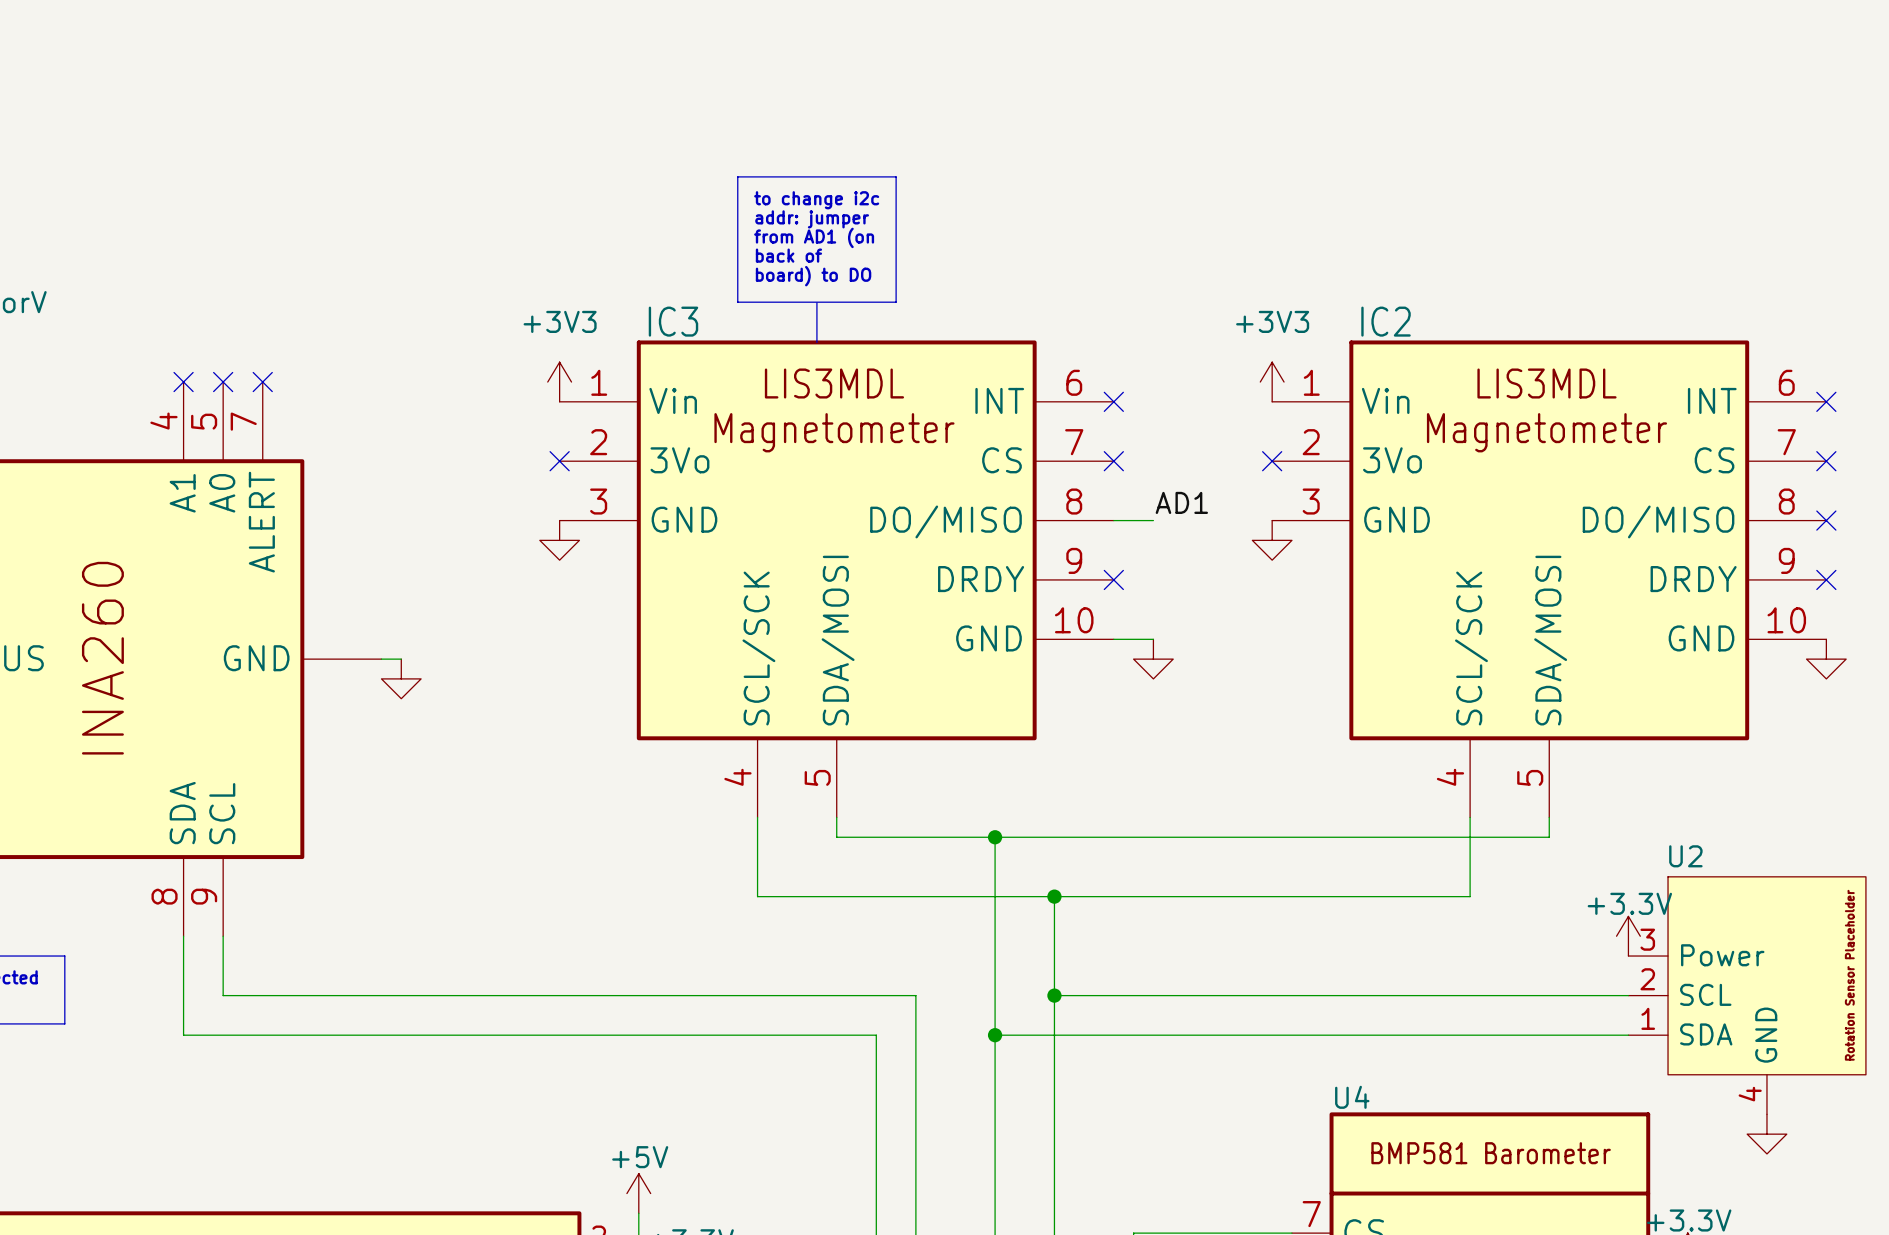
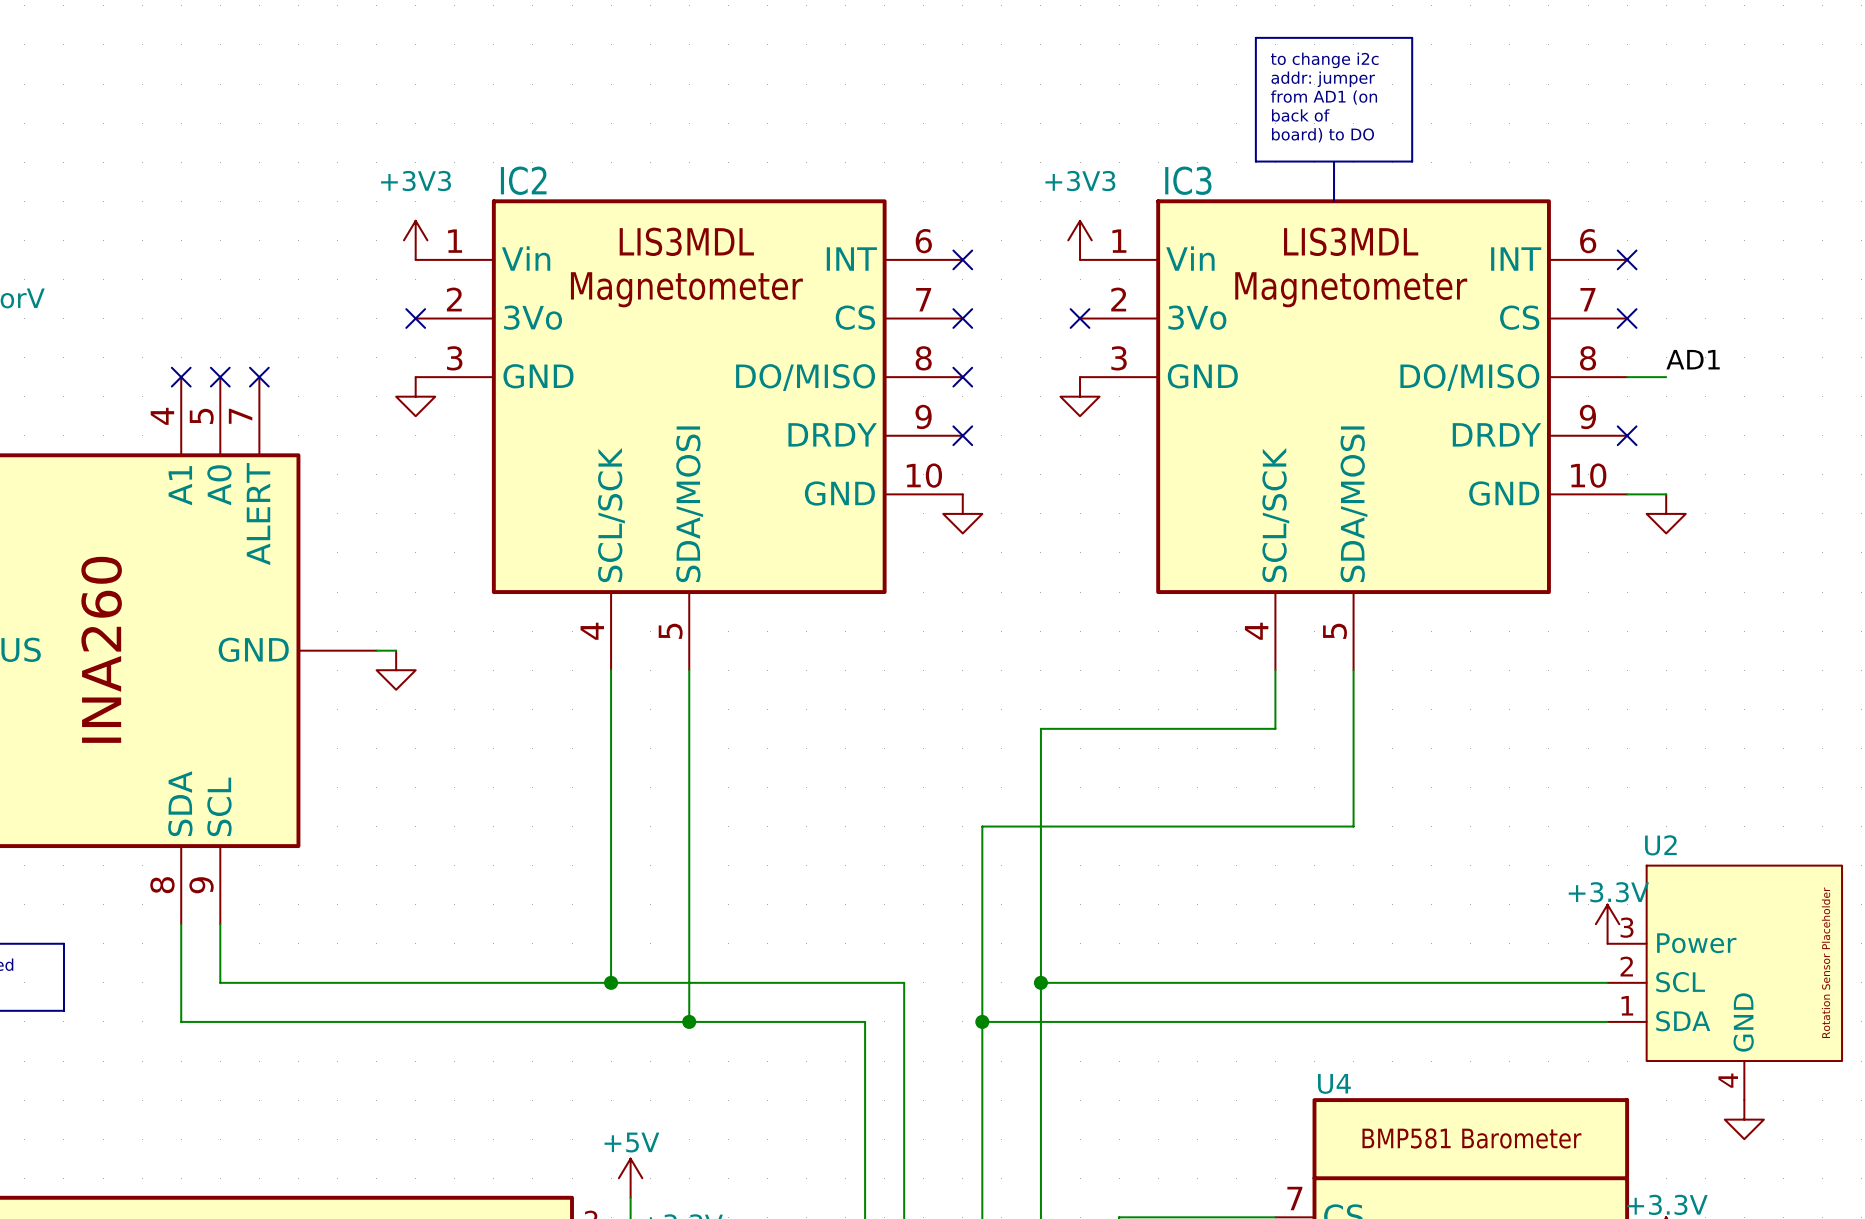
line: none -> (1255, 37) (1412, 37) (1412, 161) (1255, 161) (1255, 37)
text: none -> to change i2c (1324, 60)
text: none -> addr: jumper (1323, 79)
text: none -> from AD1 (on (1323, 97)
text: none -> back of (1300, 115)
text: none -> board) to DO (1323, 135)
bus: none -> (1334, 162) (1334, 201)
line: (737, 176) (896, 176) (896, 302) (737, 302) (737, 176) -> none
text: to change i2c (816, 200) -> none
text: addr: jumper (812, 219) -> none
text: from AD1 (on (814, 237) -> none
text: back of (788, 255) -> none
no-connect mark: none -> (962, 259)
no-connect mark: none -> (1627, 259)
text: board) to DO (813, 276) -> none
bus: (816, 302) (816, 342) -> none
no-connect mark: none -> (415, 318)
no-connect mark: none -> (962, 318)
no-connect mark: none -> (1080, 318)
no-connect mark: none -> (1627, 318)
label: none -> AD1 (1693, 359)
power symbol position: +3V3 (559, 382) -> +3V3 (415, 240)
no-connect mark: none -> (962, 377)
power symbol position: +3V3 (1272, 382) -> +3V3 (1080, 240)
power symbol: none -> (1080, 396)
no-connect mark: (1113, 401) -> none
no-connect mark: (1826, 401) -> none
no-connect mark: none -> (962, 435)
no-connect mark: none -> (1627, 435)
no-connect mark: (559, 461) -> none
no-connect mark: (1113, 461) -> none
no-connect mark: (1272, 461) -> none
no-connect mark: (1826, 461) -> none
label: AD1 (1181, 502) -> none
power symbol: none -> (962, 513)
wire: (1113, 520) (1153, 520) -> none
no-connect mark: (1826, 520) -> none
power symbol position: (559, 540) -> (415, 396)
power symbol: (1272, 540) -> none
IC3 position: (836, 578) -> (1353, 434)
IC2 position: (1549, 578) -> (689, 434)
no-connect mark: (1113, 579) -> none
no-connect mark: (1826, 579) -> none
wire: (1113, 639) (1153, 639) -> none
power symbol: (1153, 659) -> none
power symbol position: (1826, 659) -> (1666, 513)
wire: none -> (611, 670) (611, 982)
wire: none -> (689, 670) (689, 1021)
wire: none -> (1275, 670) (1275, 728) (1040, 728) (1040, 885)
wire: (757, 817) (757, 896) (1470, 896) (1470, 817) -> none
wire: (836, 817) (836, 837) (995, 837) -> none
wire: (1549, 817) (1549, 837) (1371, 837) -> (1353, 670) (1353, 826)
junction: (995, 837) -> none
junction: (1054, 896) -> none
junction: none -> (611, 982)
junction: none -> (689, 1021)

